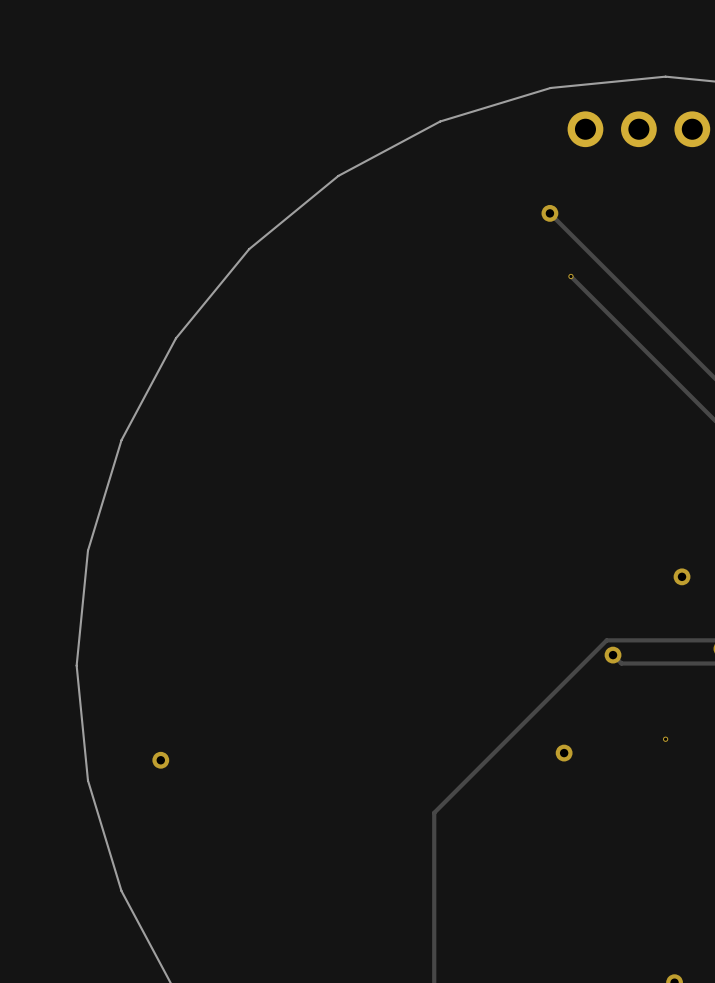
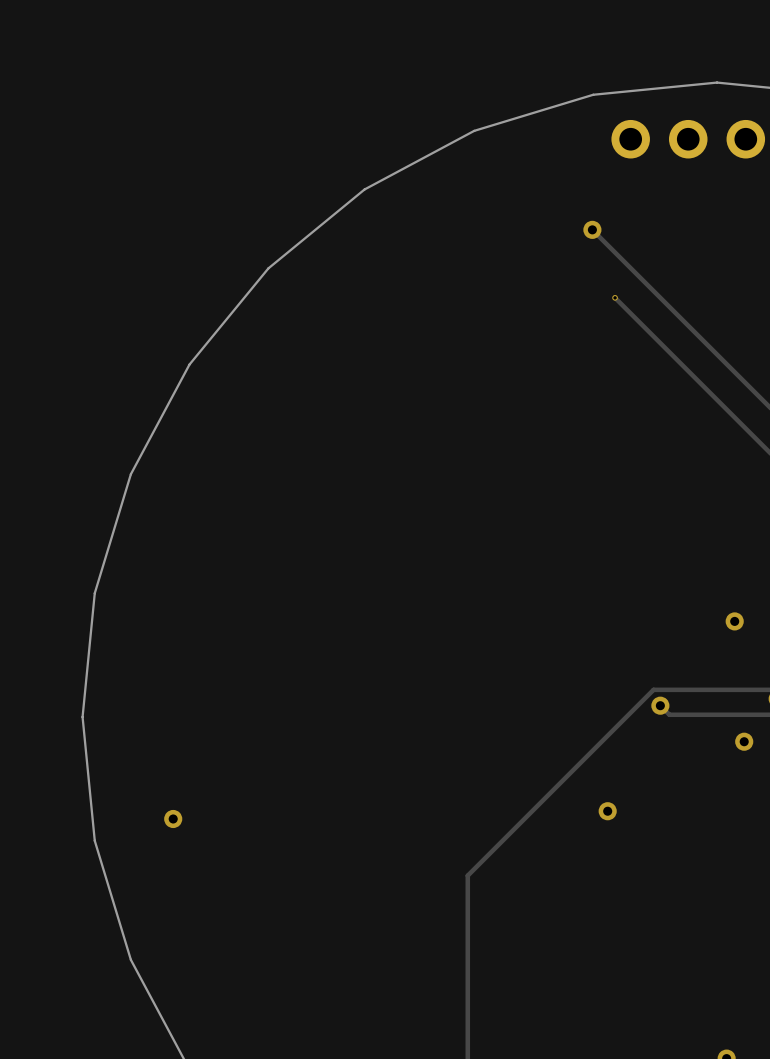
via: none -> (744, 741)
via: (665, 739) -> none

